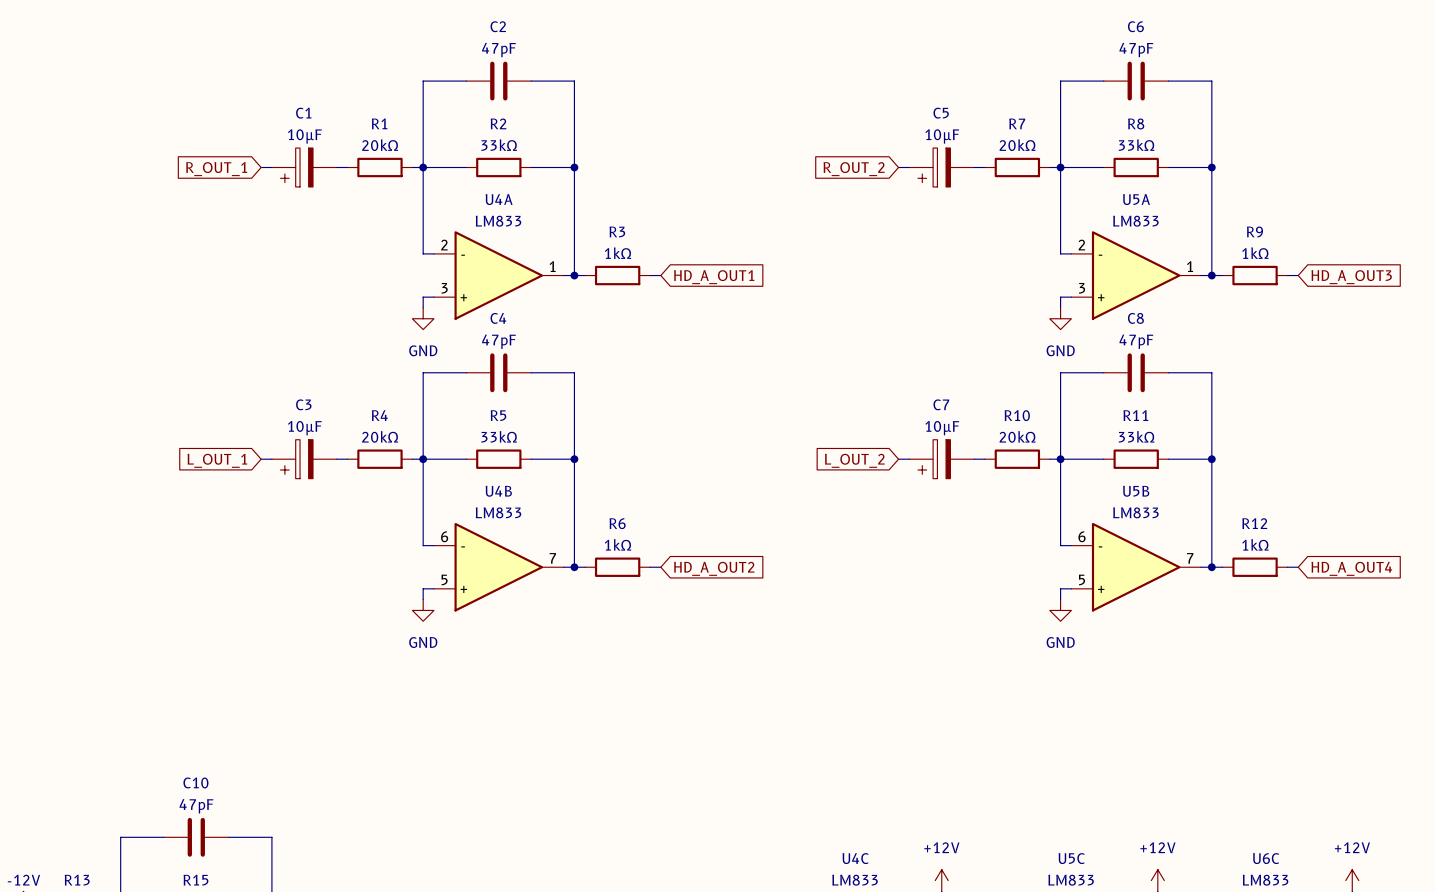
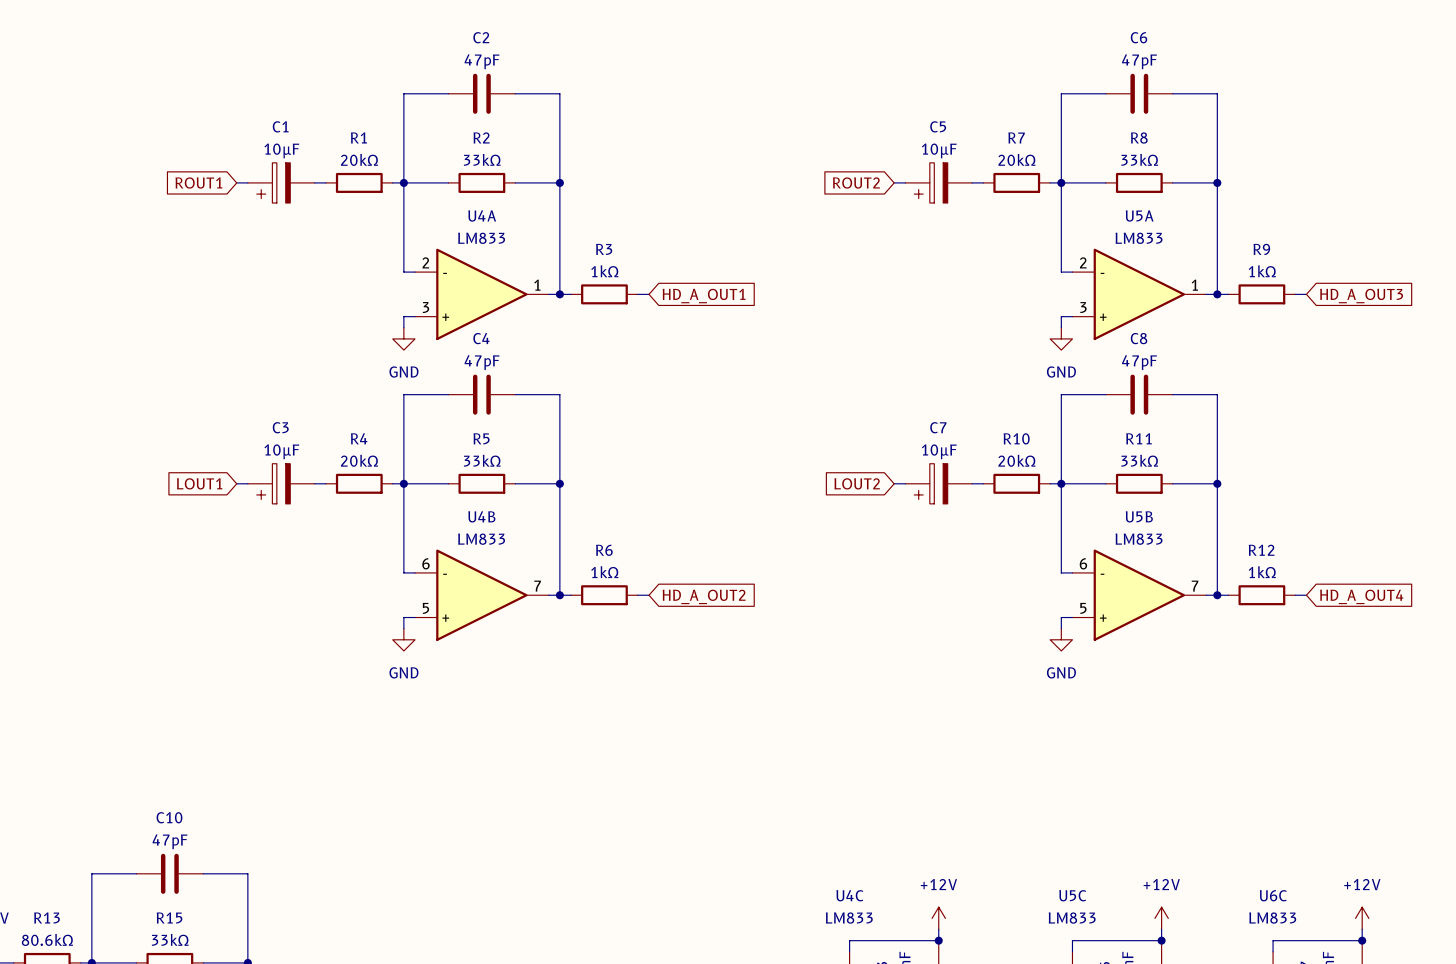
global label: R_OUT_1 (216, 169) -> ROUT1 (198, 183)
global label: R_OUT_2 (854, 169) -> ROUT2 (856, 183)
global label: L_OUT_1 (217, 460) -> LOUT1 (199, 483)
global label: L_OUT_2 (854, 460) -> LOUT2 (857, 483)

